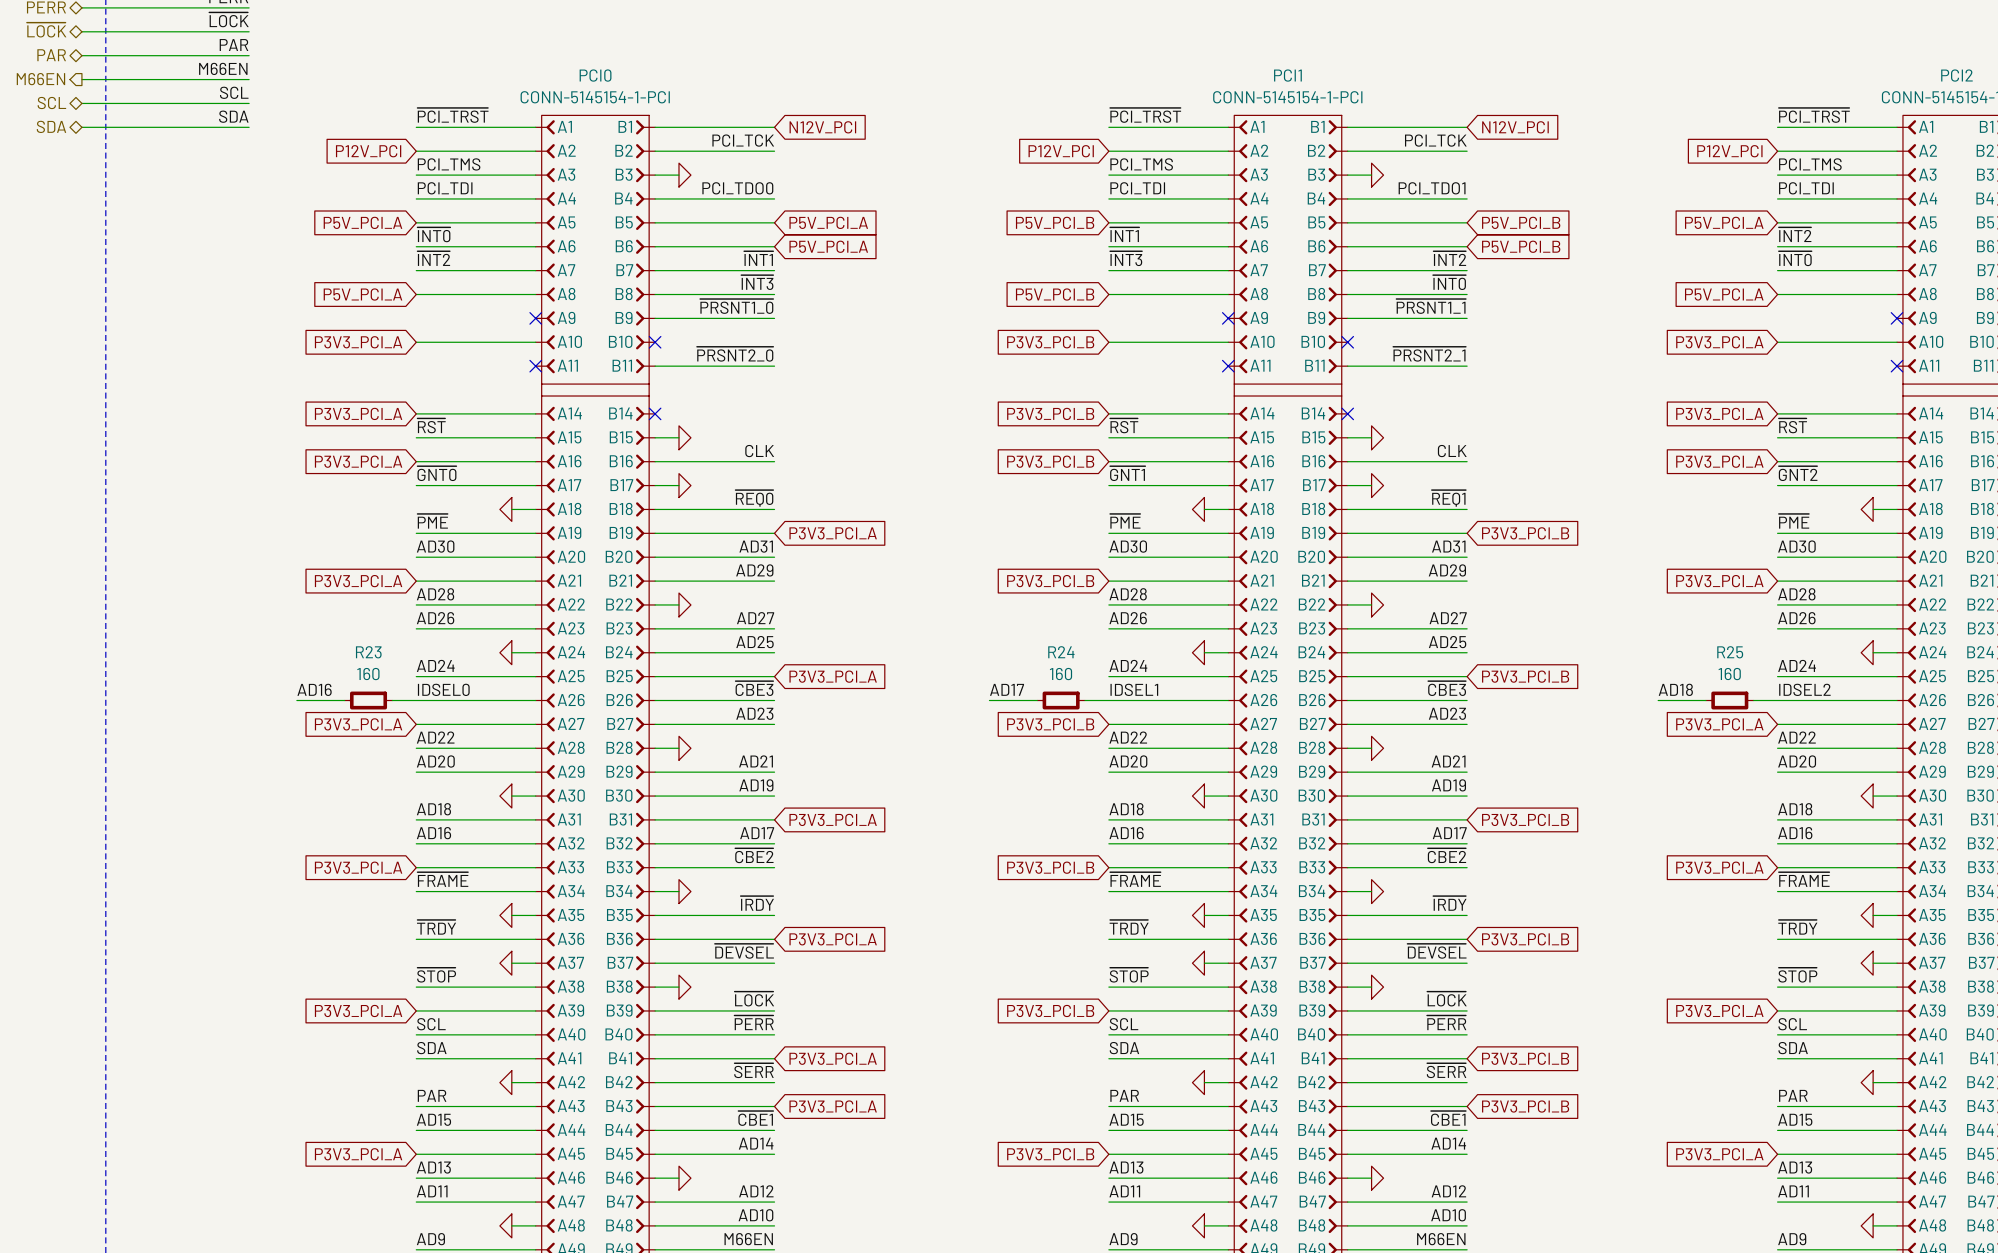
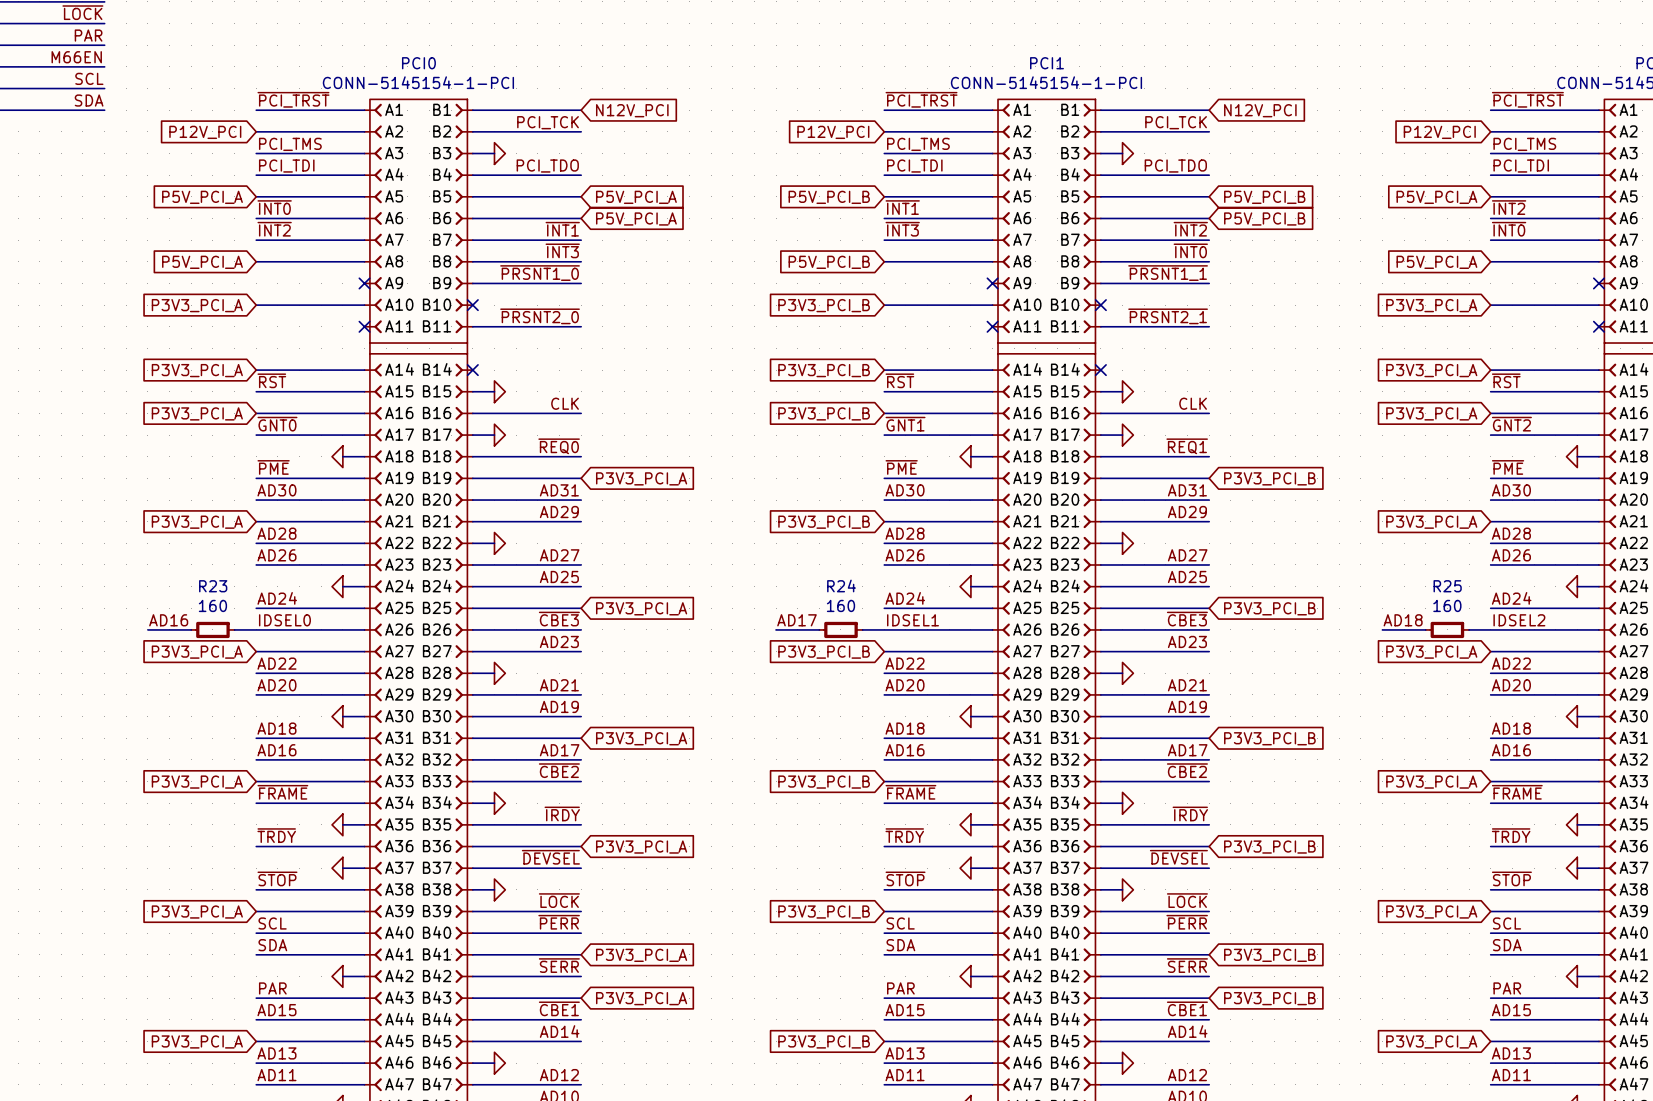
label: PCI_TDO0 (737, 188) -> PCI_TDO (547, 166)
label: PCI_TDO1 (1432, 188) -> PCI_TDO (1175, 166)

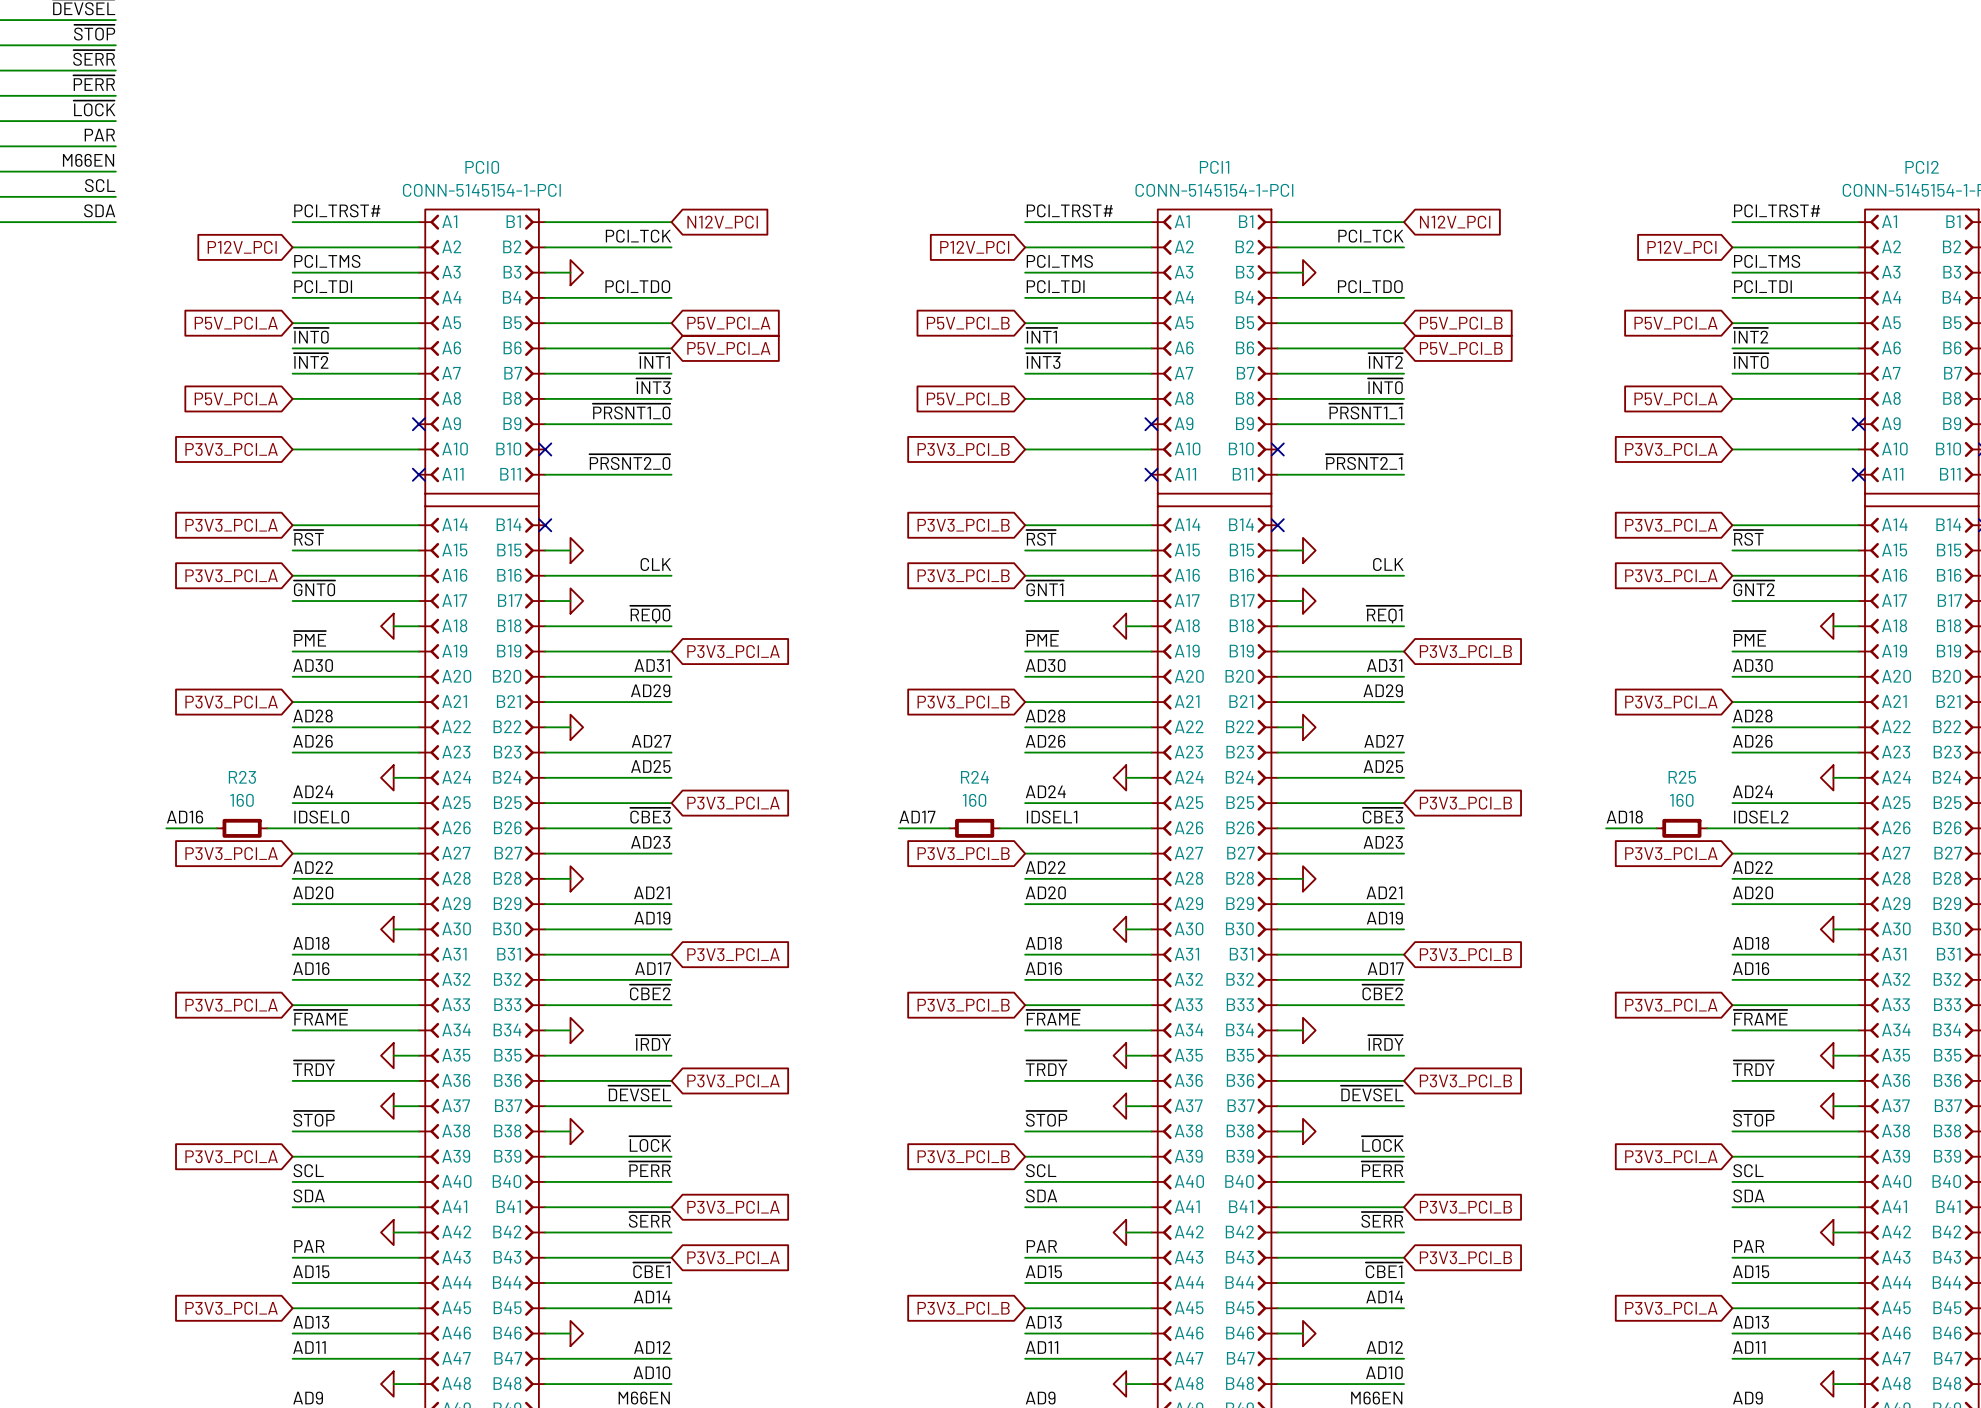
label: ~{PCI_TRST} (293, 99) -> PCI_TRST# (337, 210)
label: ~{PCI_TRST} (921, 99) -> PCI_TRST# (1069, 210)
label: ~{PCI_TRST} (1527, 99) -> PCI_TRST# (1777, 210)

